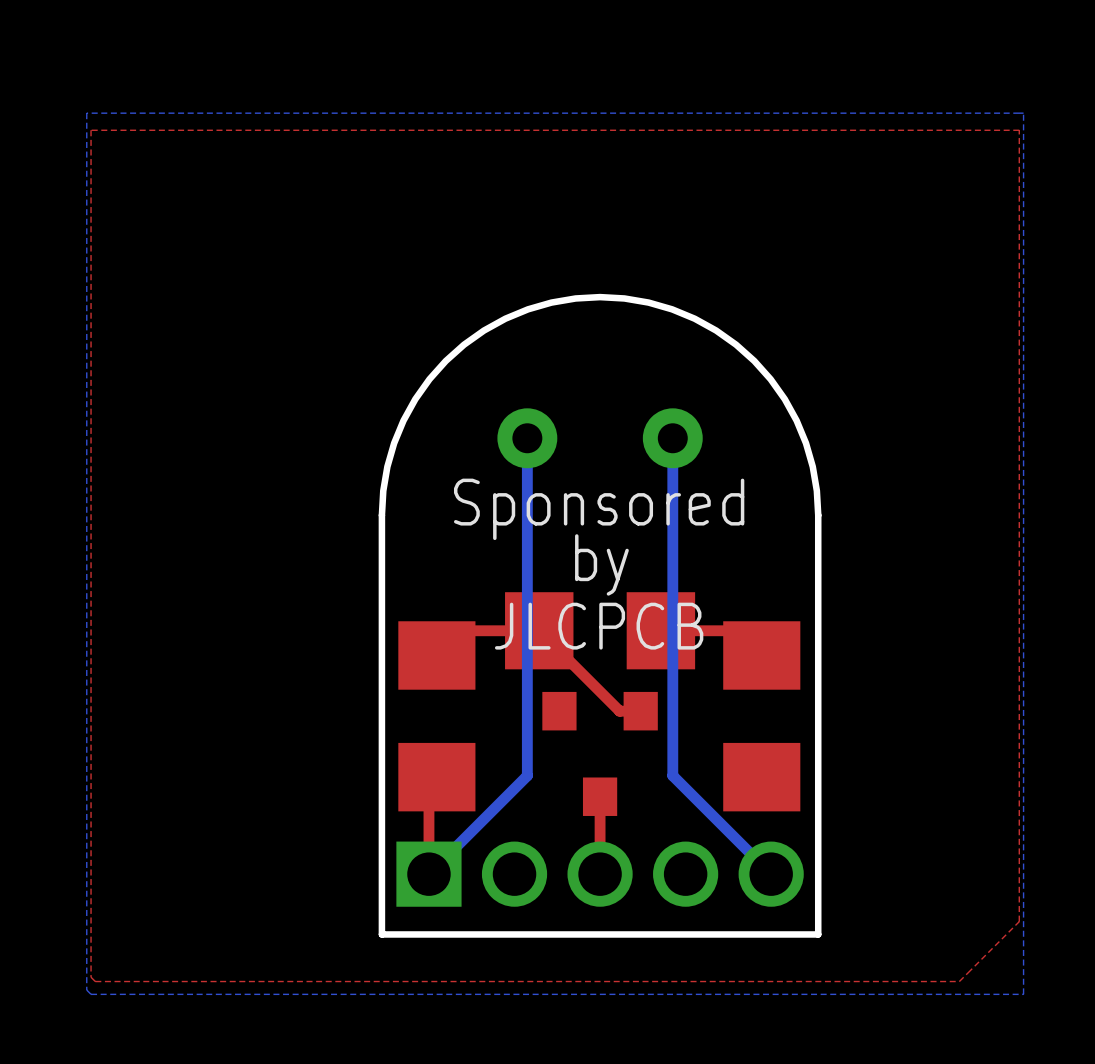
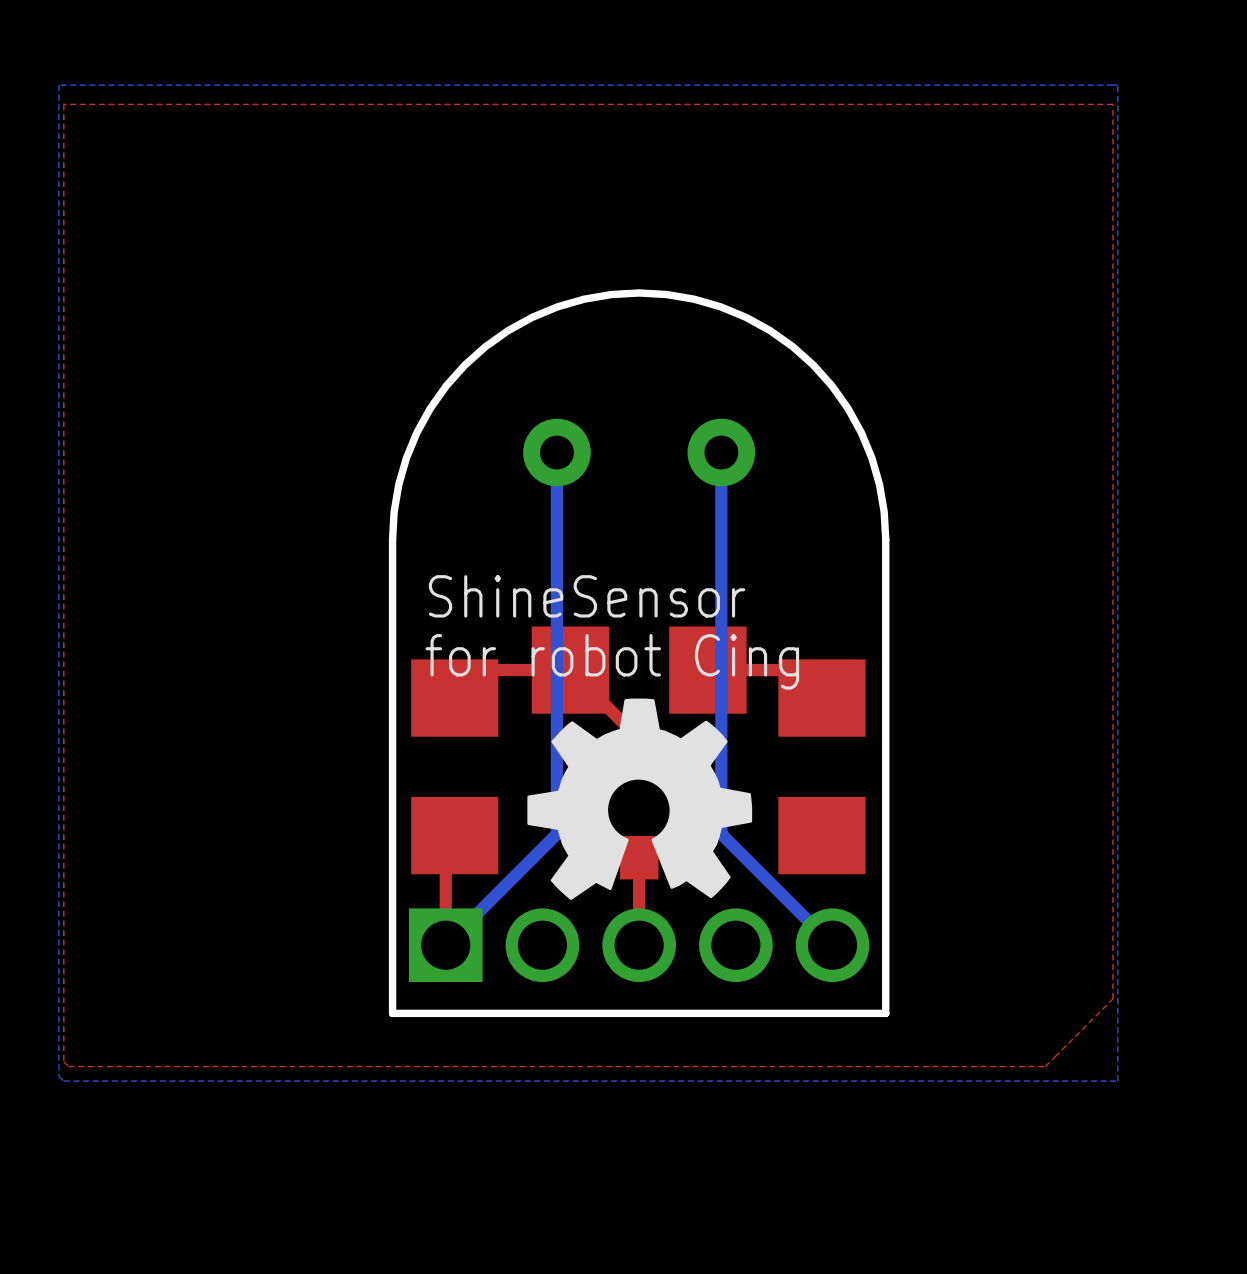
text: Sponsored (599, 509) -> none
text: by (601, 564) -> none
text: none -> ShineSensor (587, 596)
text: none -> for robot Cing (612, 661)
text: JLCPCB (599, 626) -> none
drawing: none -> [527, 698, 753, 900]

